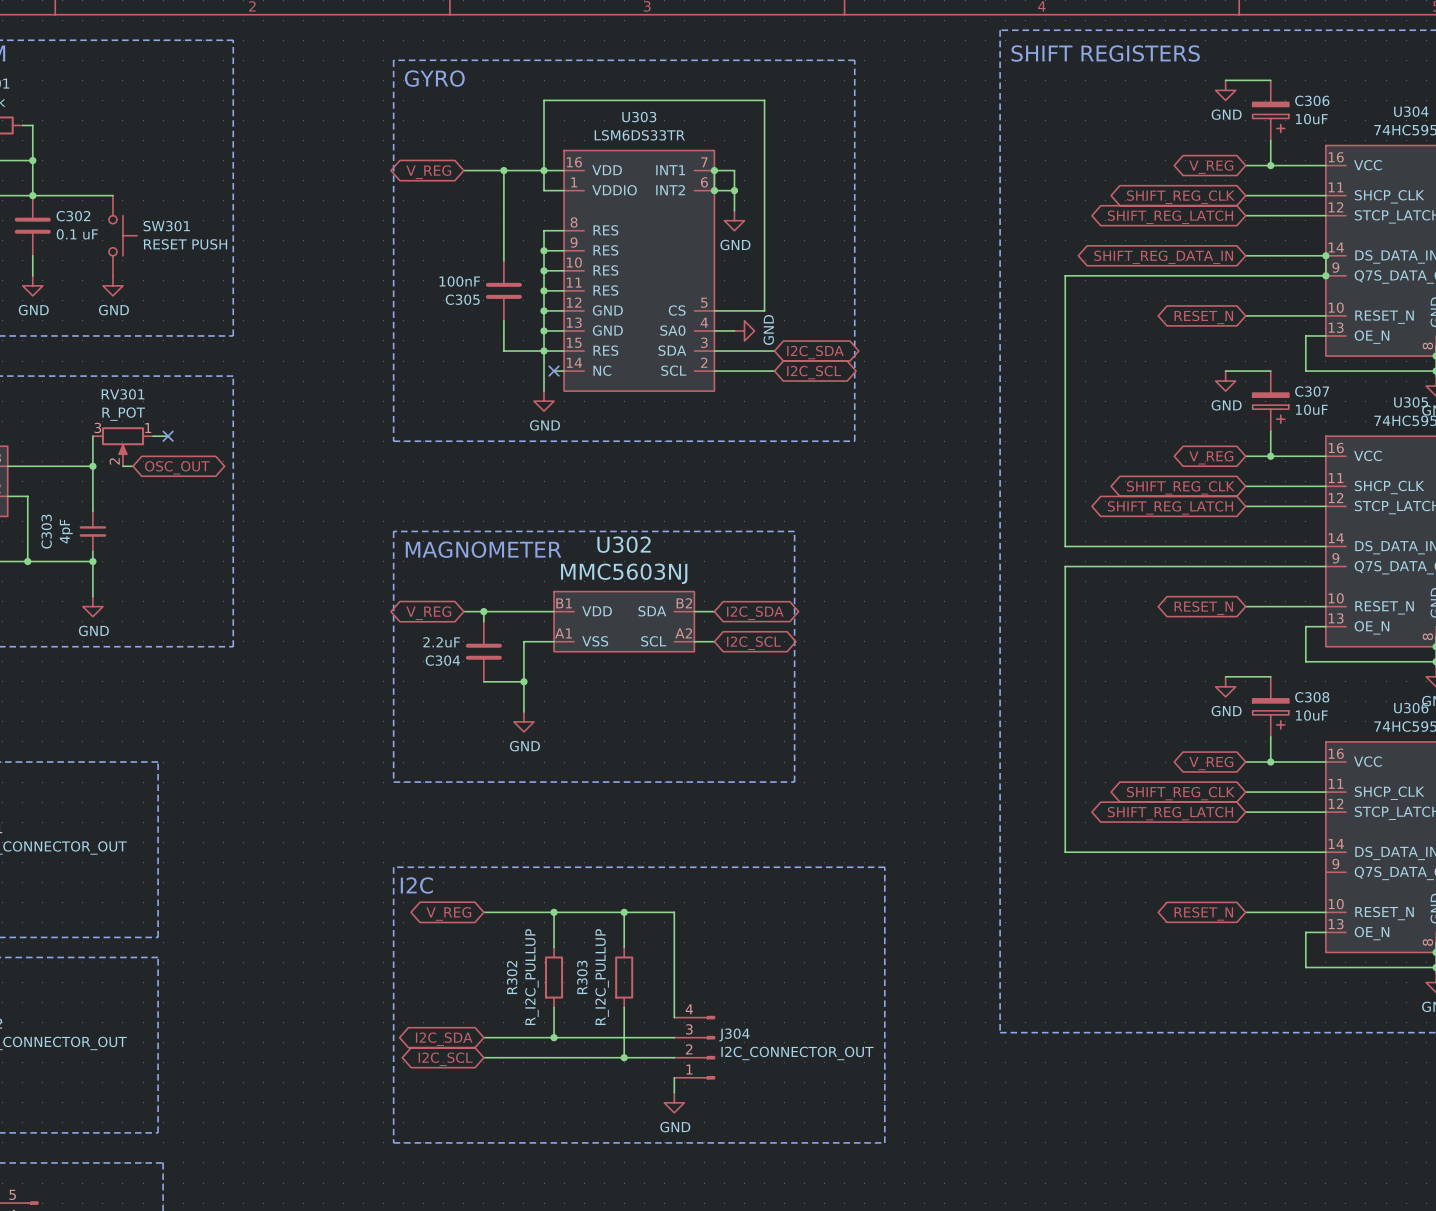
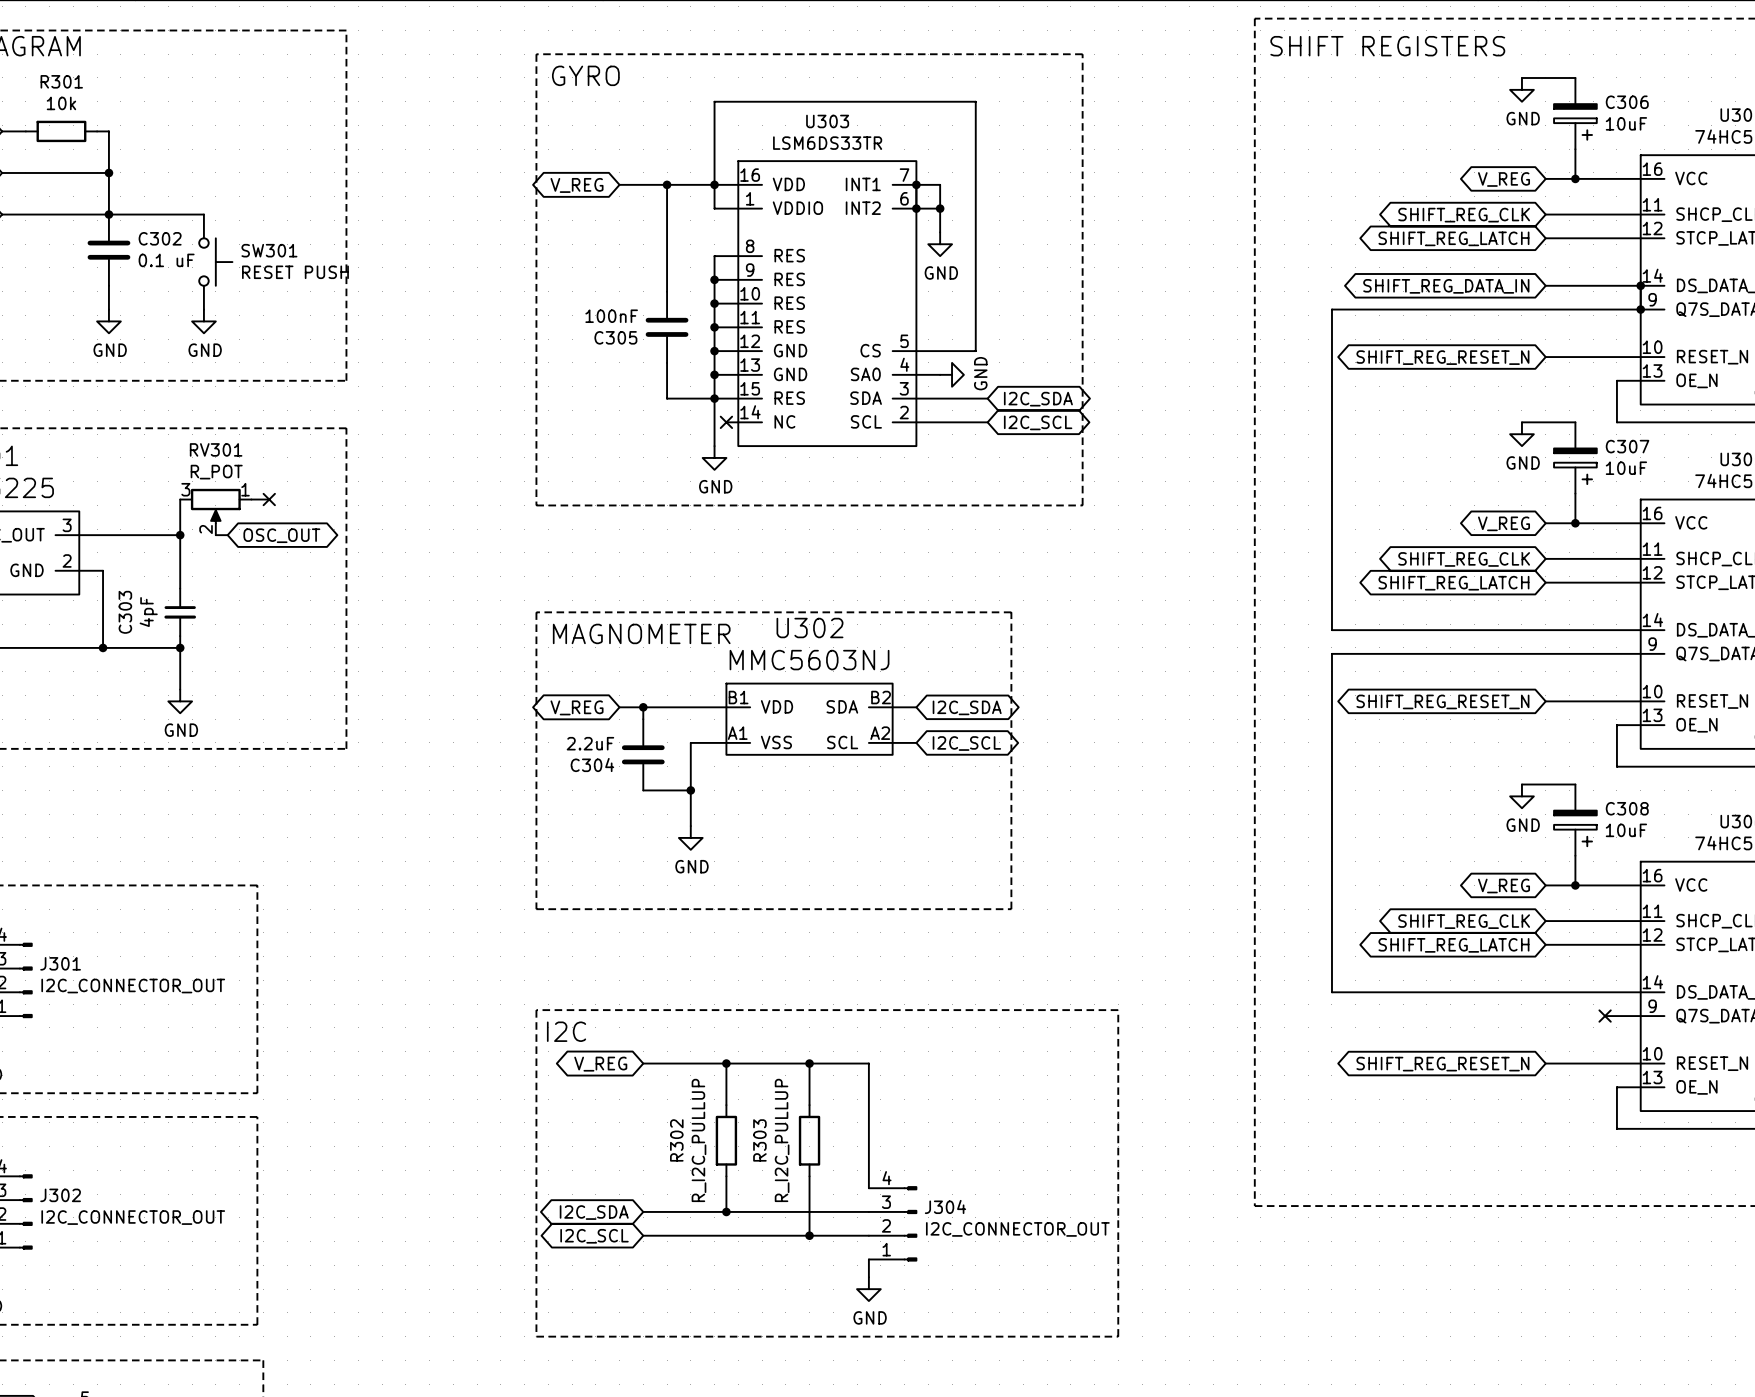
global label: RESET_N (1203, 317) -> SHIFT_REG_RESET_N (1442, 357)
global label: RESET_N (1203, 608) -> SHIFT_REG_RESET_N (1442, 701)
wire: none -> (1605, 1016) (1640, 1016)
no-connect mark: none -> (1605, 1016)
global label: RESET_N (1203, 913) -> SHIFT_REG_RESET_N (1442, 1064)

